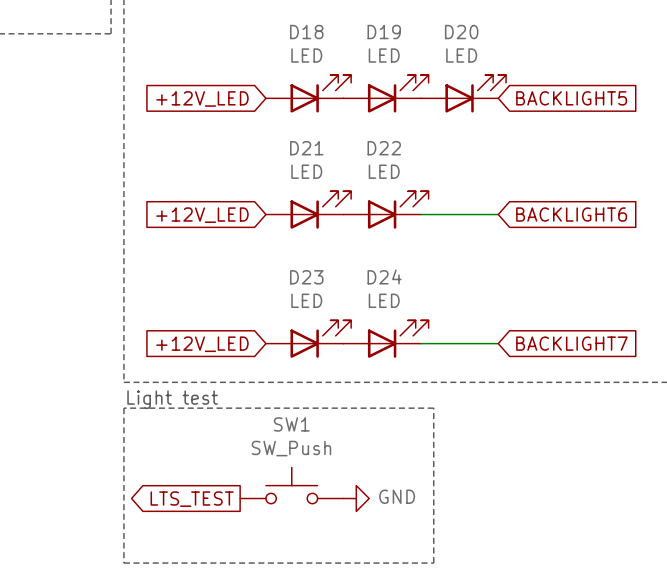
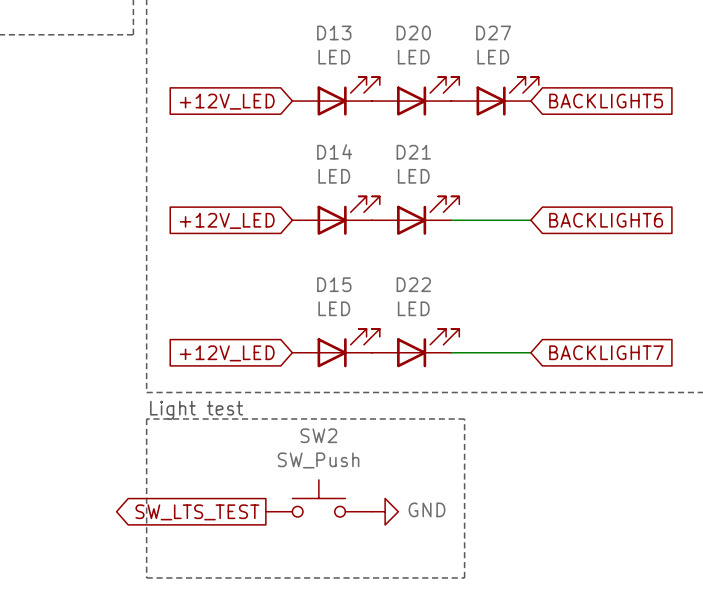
D18 name: D18 (306, 32) -> D13 (334, 32)
D19 name: D19 (384, 32) -> D20 (413, 32)
D20 name: D20 (461, 32) -> D27 (493, 32)
D21 name: D21 (306, 148) -> D14 (334, 151)
D22 name: D22 (384, 148) -> D21 (413, 152)
D24 name: D24 (384, 276) -> D22 (413, 284)
D23 name: D23 (306, 277) -> D15 (334, 284)
SW1 name: SW1 (291, 424) -> SW2 (318, 435)
global label: LTS_TEST (192, 499) -> SW_LTS_TEST (197, 512)

